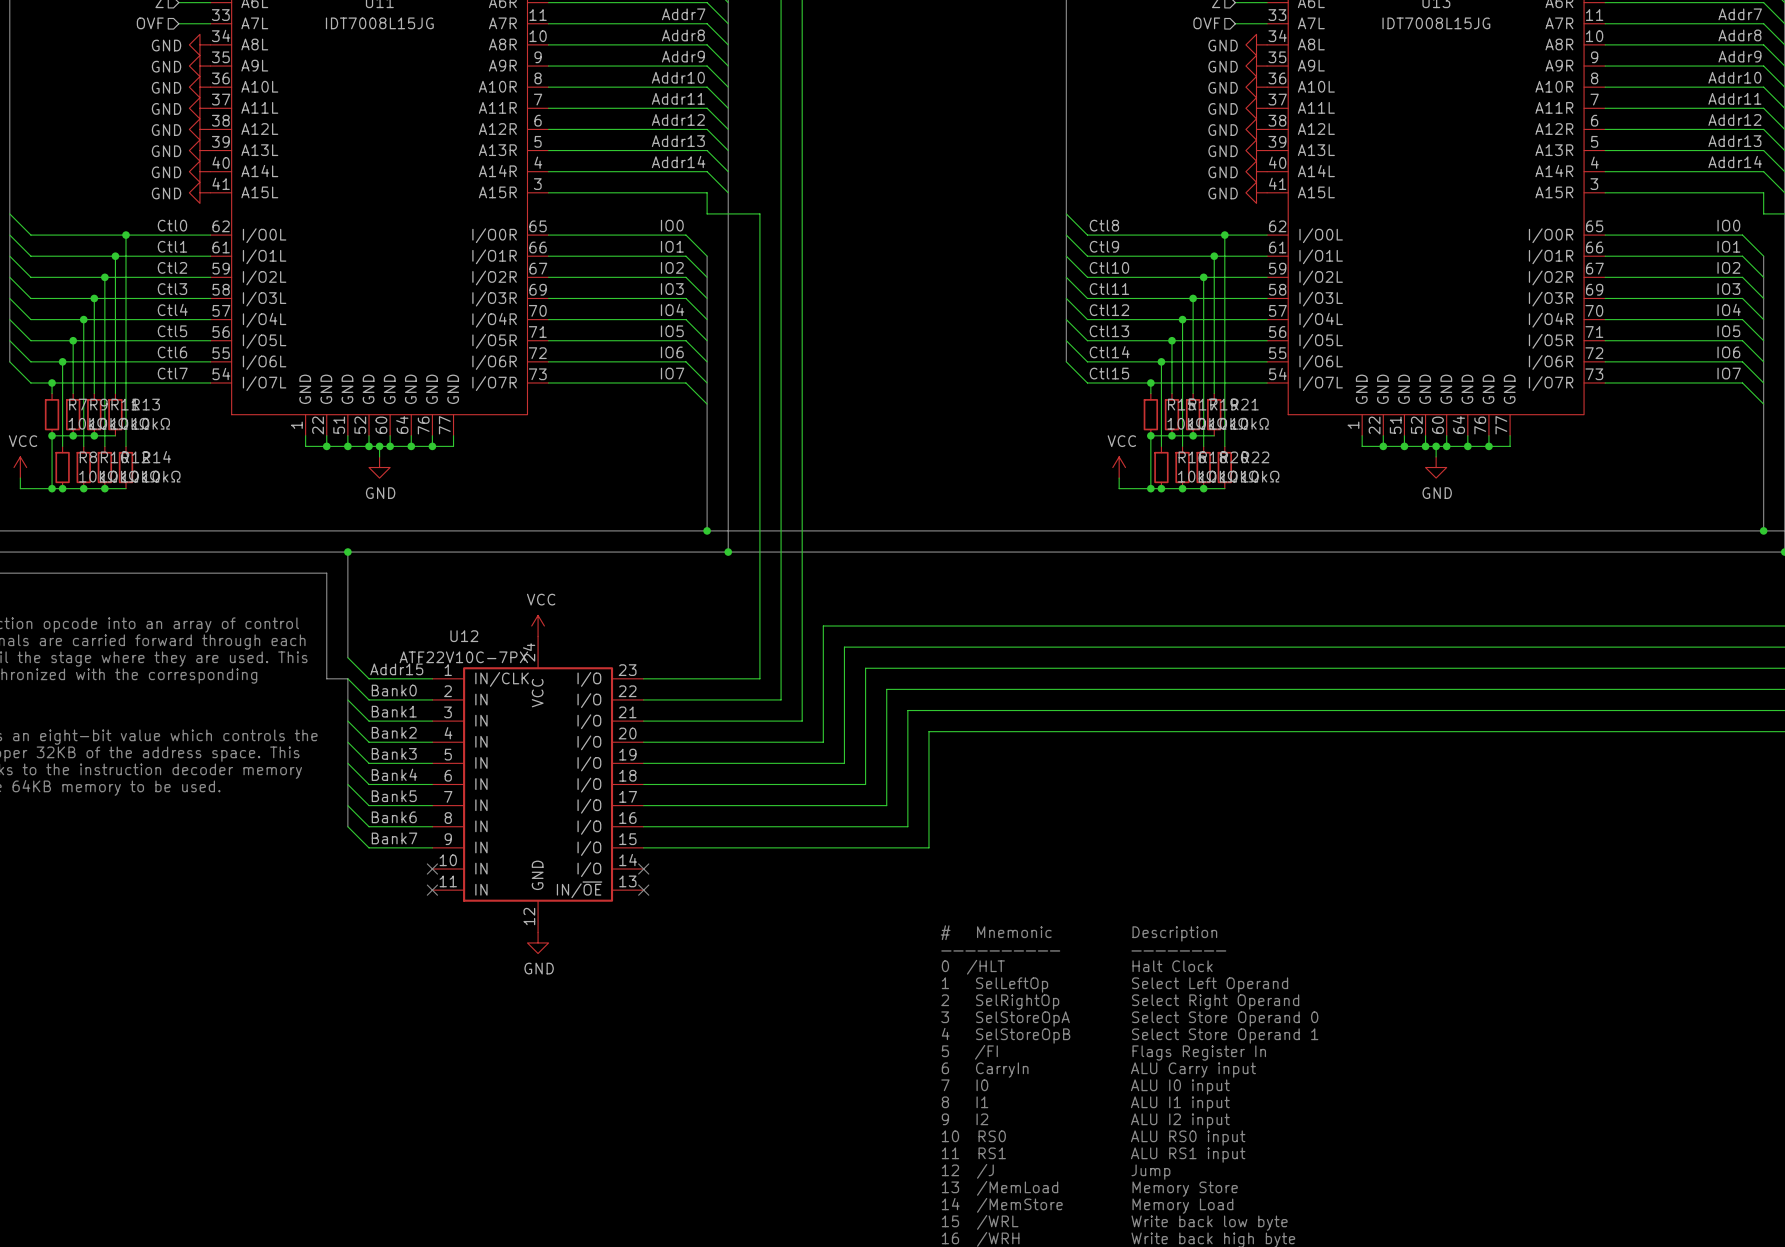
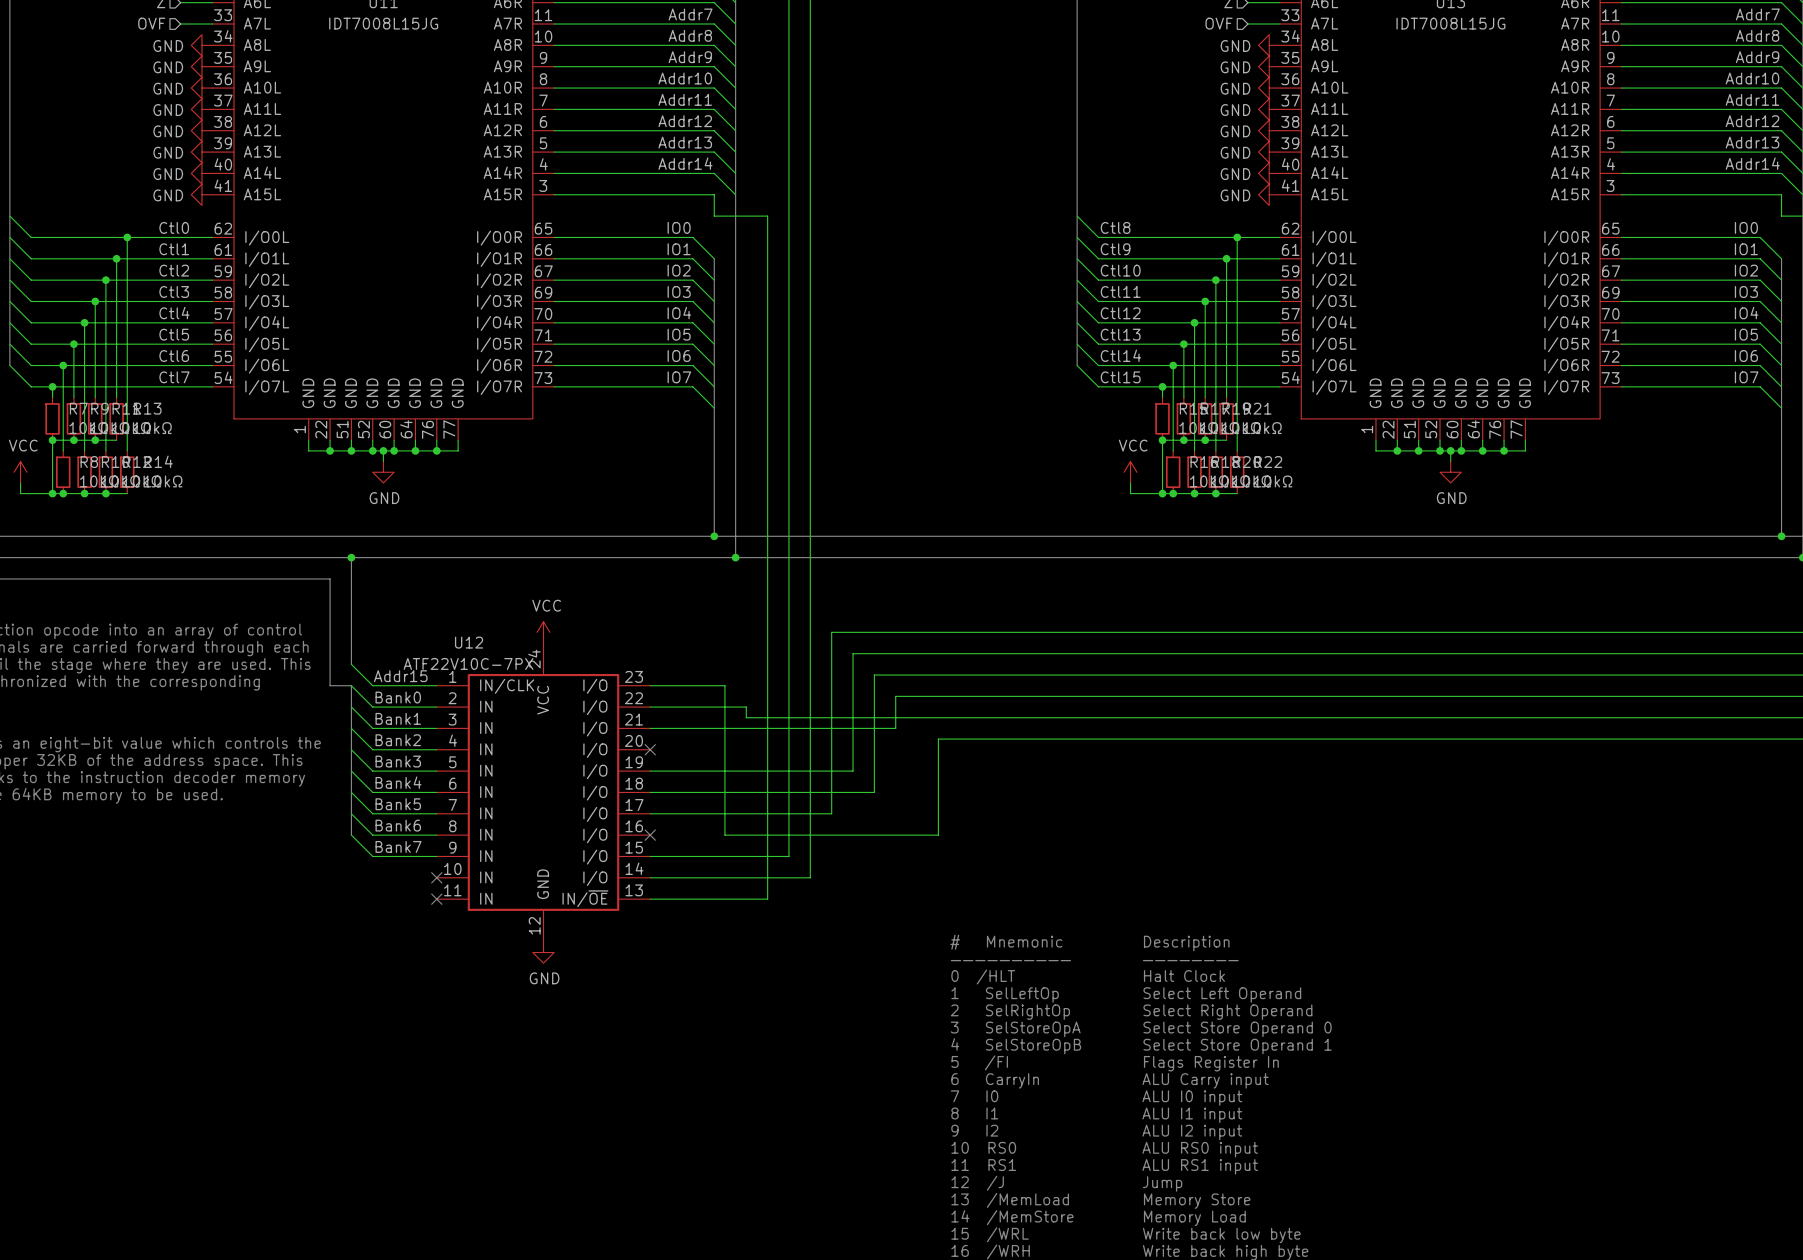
wire: (717, 678) (759, 678) -> (724, 685) (724, 835)
wire: none -> (767, 685) (767, 899) (650, 899)
wire: (738, 699) (781, 699) -> (746, 707) (746, 717) (917, 717)
wire: (907, 710) (907, 826) -> (938, 835) (917, 835)
wire: (886, 721) (886, 805) (823, 805) -> (831, 749) (831, 813)
wire: none -> (895, 728) (810, 728) (810, 877) (650, 877)
wire: (643, 742) (823, 742) -> none
no-connect mark: none -> (650, 749)
wire: (643, 826) (717, 826) -> none
no-connect mark: none -> (650, 835)
wire: (928, 826) (928, 847) (781, 847) -> (788, 707) (788, 856)
no-connect mark: (643, 869) -> none
no-connect mark: (643, 890) -> none

